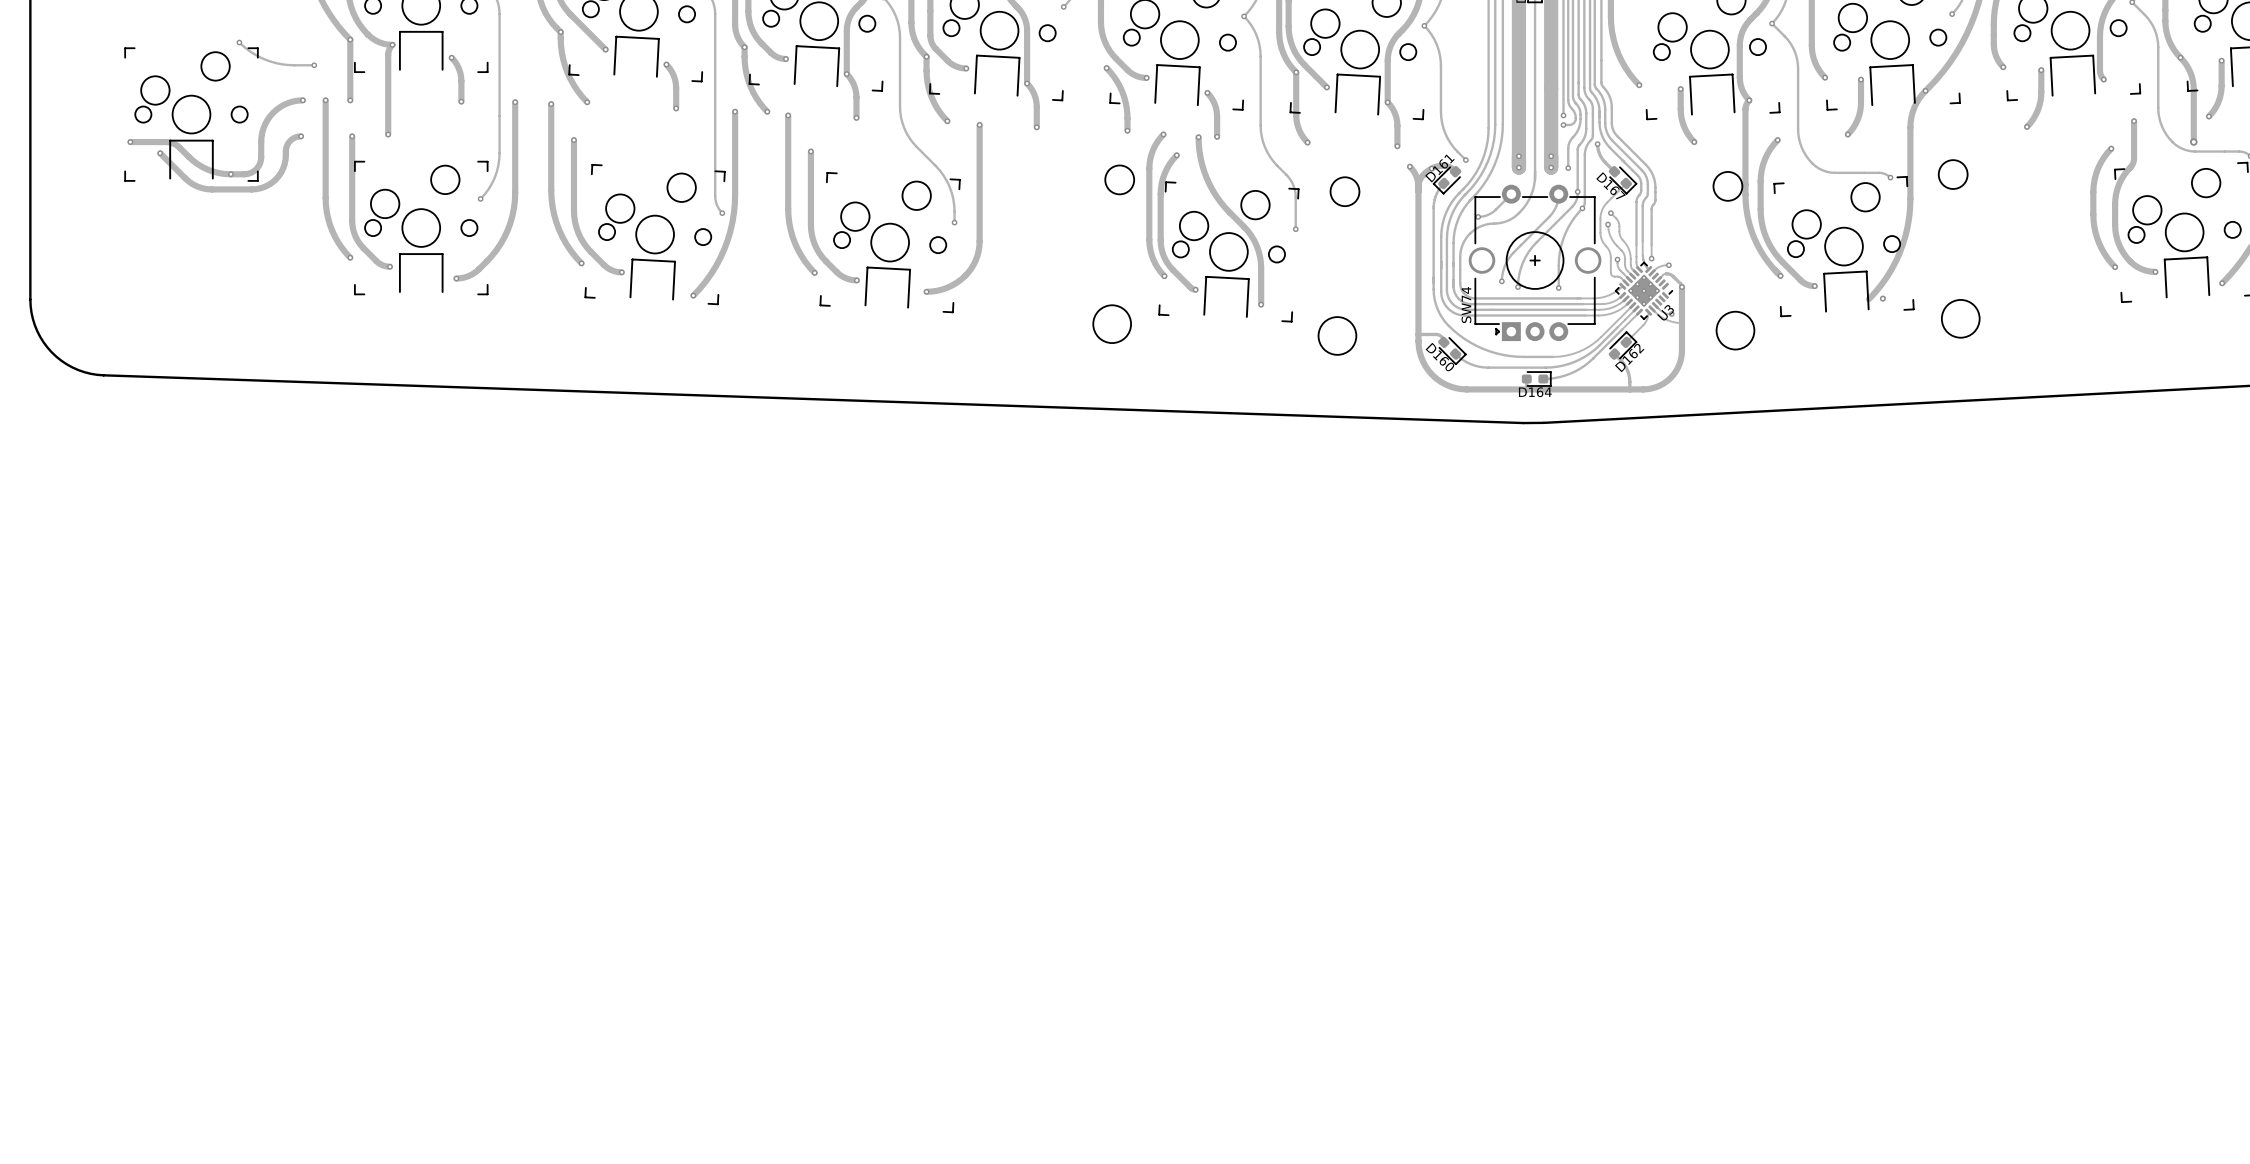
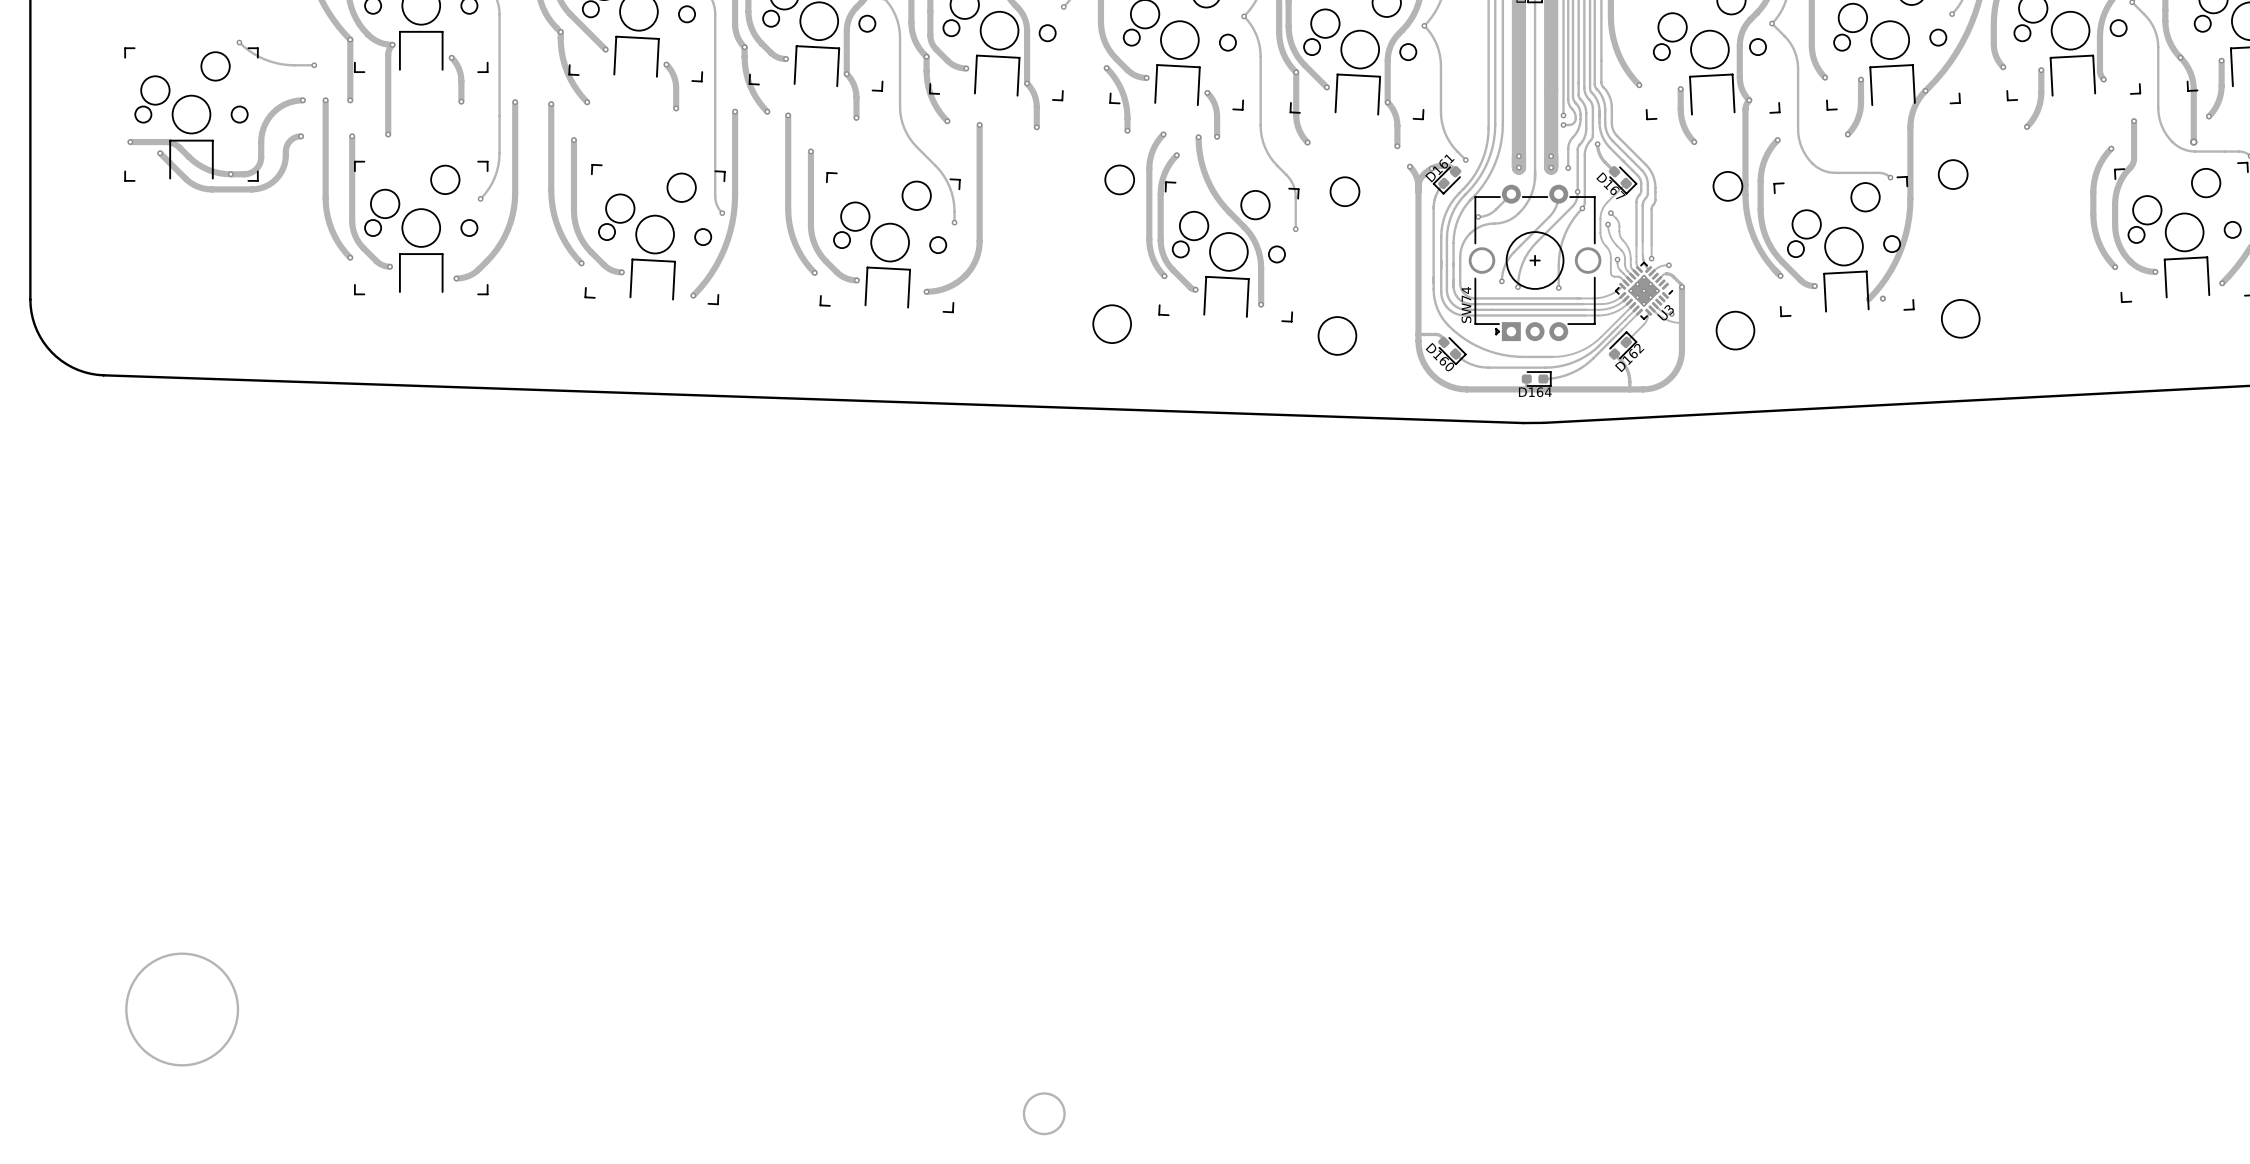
drawing: none -> [125, 952, 240, 1067]
drawing: none -> [1022, 1092, 1066, 1136]

